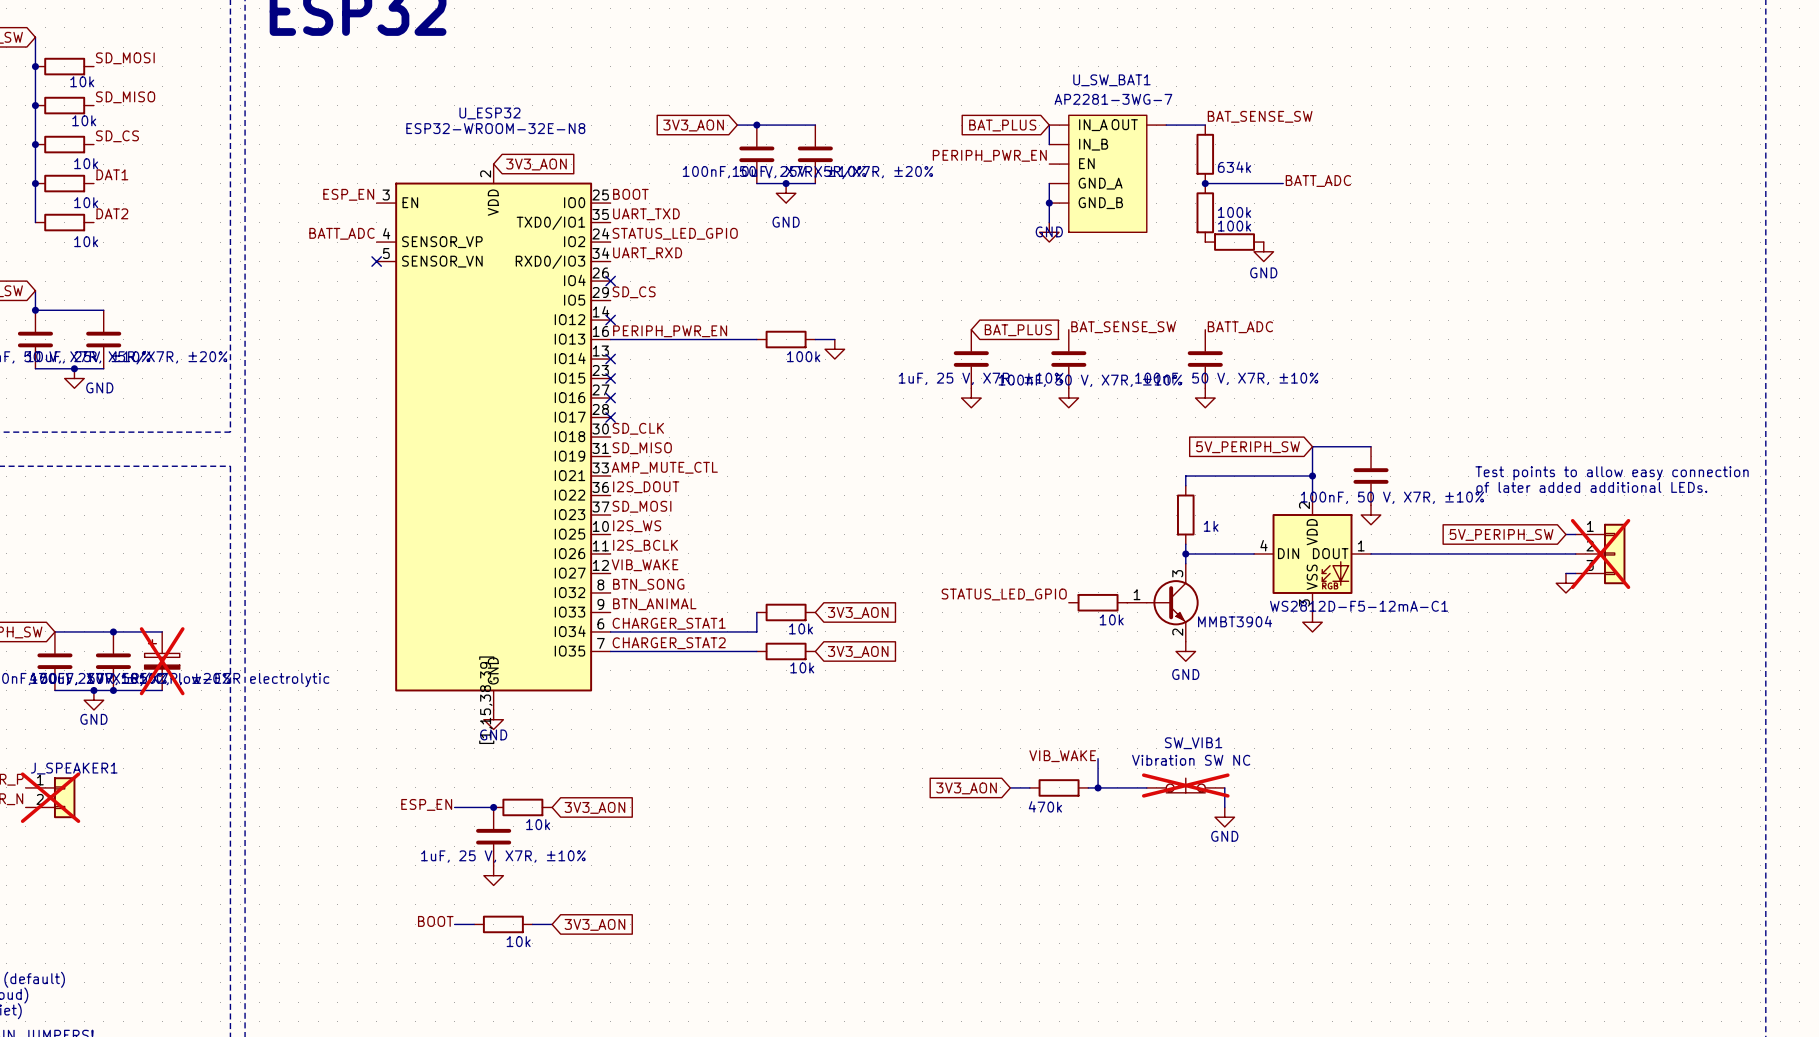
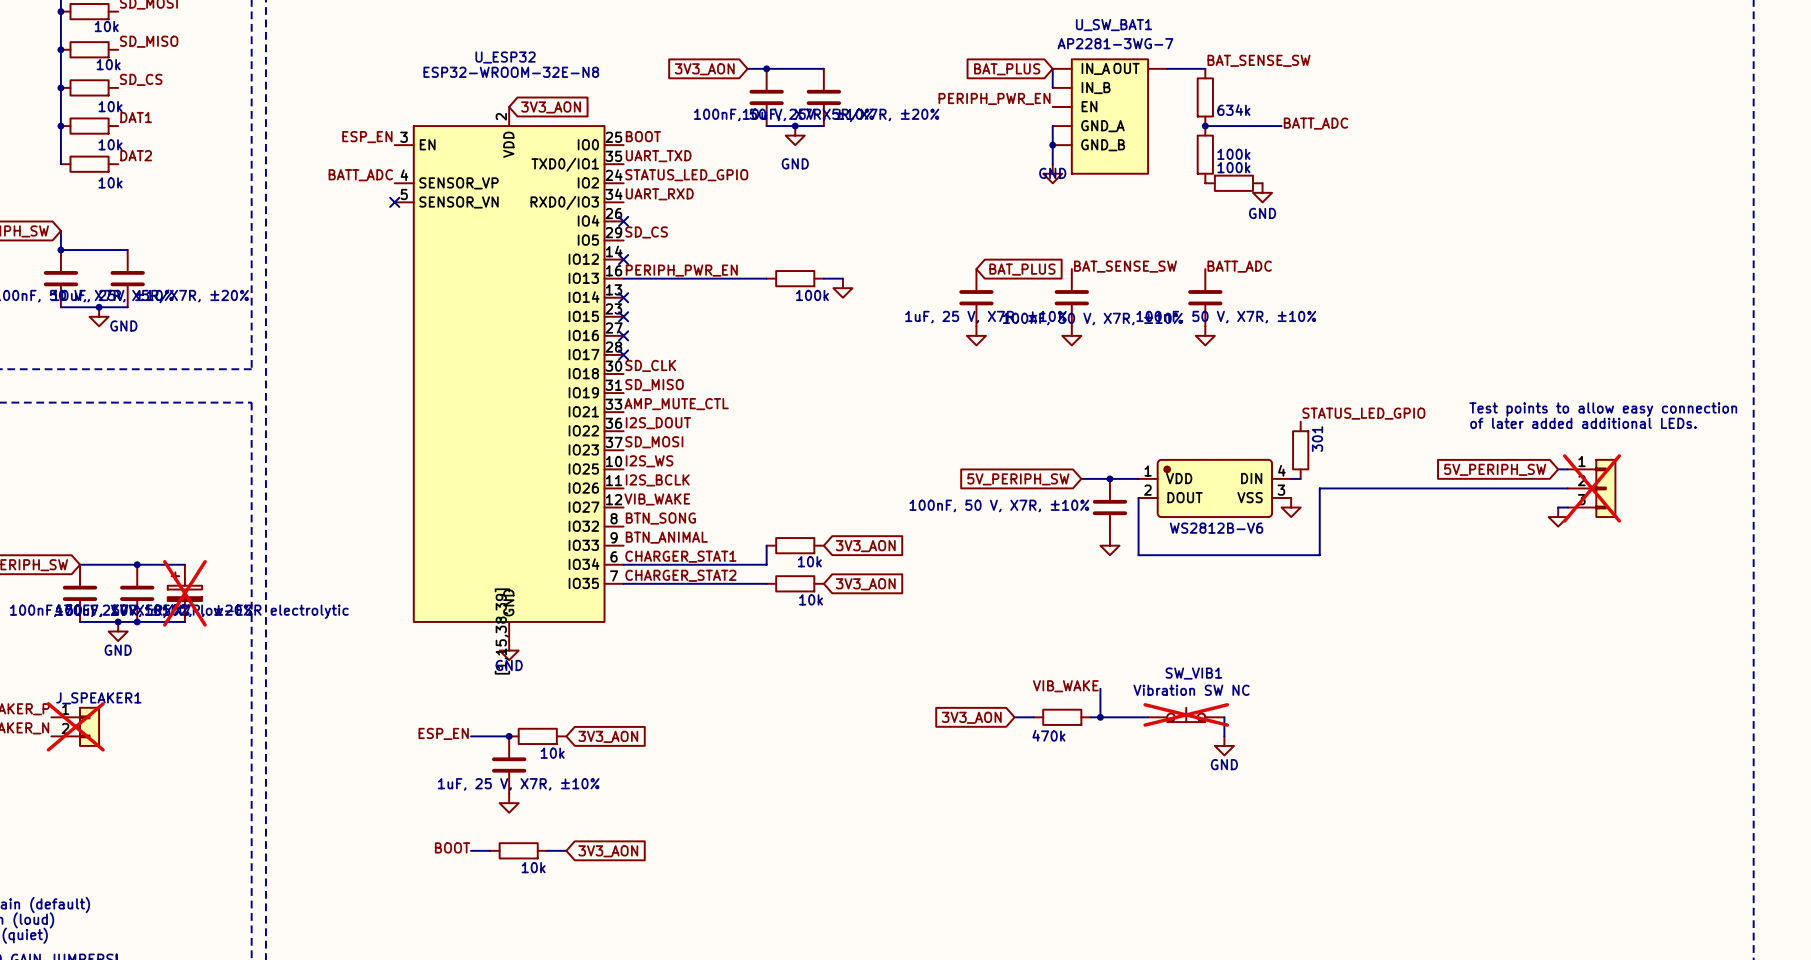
wire: (1371, 446) (1312, 446) (1312, 495) -> none
global label: 5V_PERIPH_SW (1248, 447) -> none
wire: (1312, 476) (1185, 476) (1185, 485) -> none
junction: (1312, 476) -> none
part: 100nF, 50 V, X7R, ±10% (1371, 476) -> none
label: none -> STATUS_LED_GPIO (1363, 413)
part: 1k (1185, 515) -> none
part: none -> 301 (1300, 450)
power symbol: (1371, 515) -> none
global label: none -> 5V_PERIPH_SW (1018, 479)
wire: none -> (1081, 478) (1138, 478)
junction: none -> (1109, 478)
junction: (1185, 553) -> none
part: none -> WS2812B-V6 (1214, 488)
part: WS2812D-F5-12mA-C1 (1312, 553) -> none
wire: none -> (1367, 488) (1319, 488) (1319, 555) (1138, 555) (1138, 497)
part: none -> 100nF, 50 V, X7R, ±10% (1109, 507)
power symbol: none -> (1291, 507)
label: STATUS_LED_GPIO (1004, 594) -> none
part: 10k (1098, 602) -> none
part: MMBT3904 (1162, 602) -> none
power symbol: none -> (1109, 545)
power symbol: (1312, 622) -> none
power symbol: GND (1185, 651) -> none

